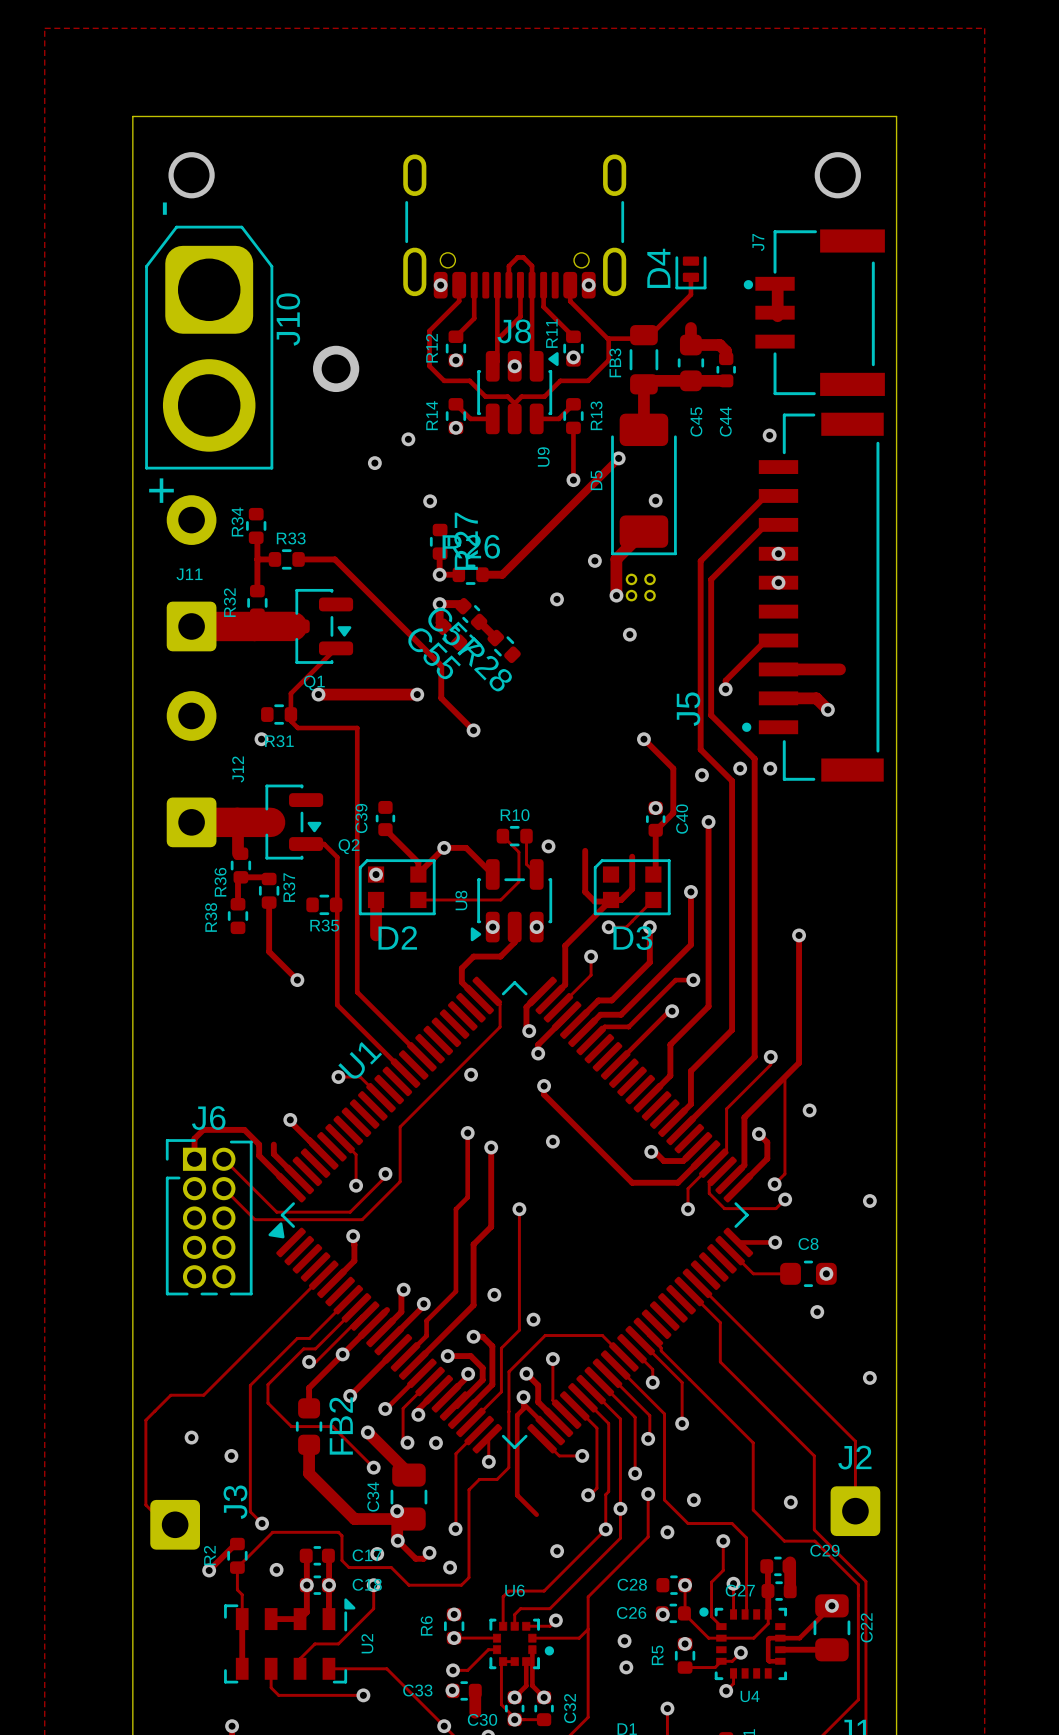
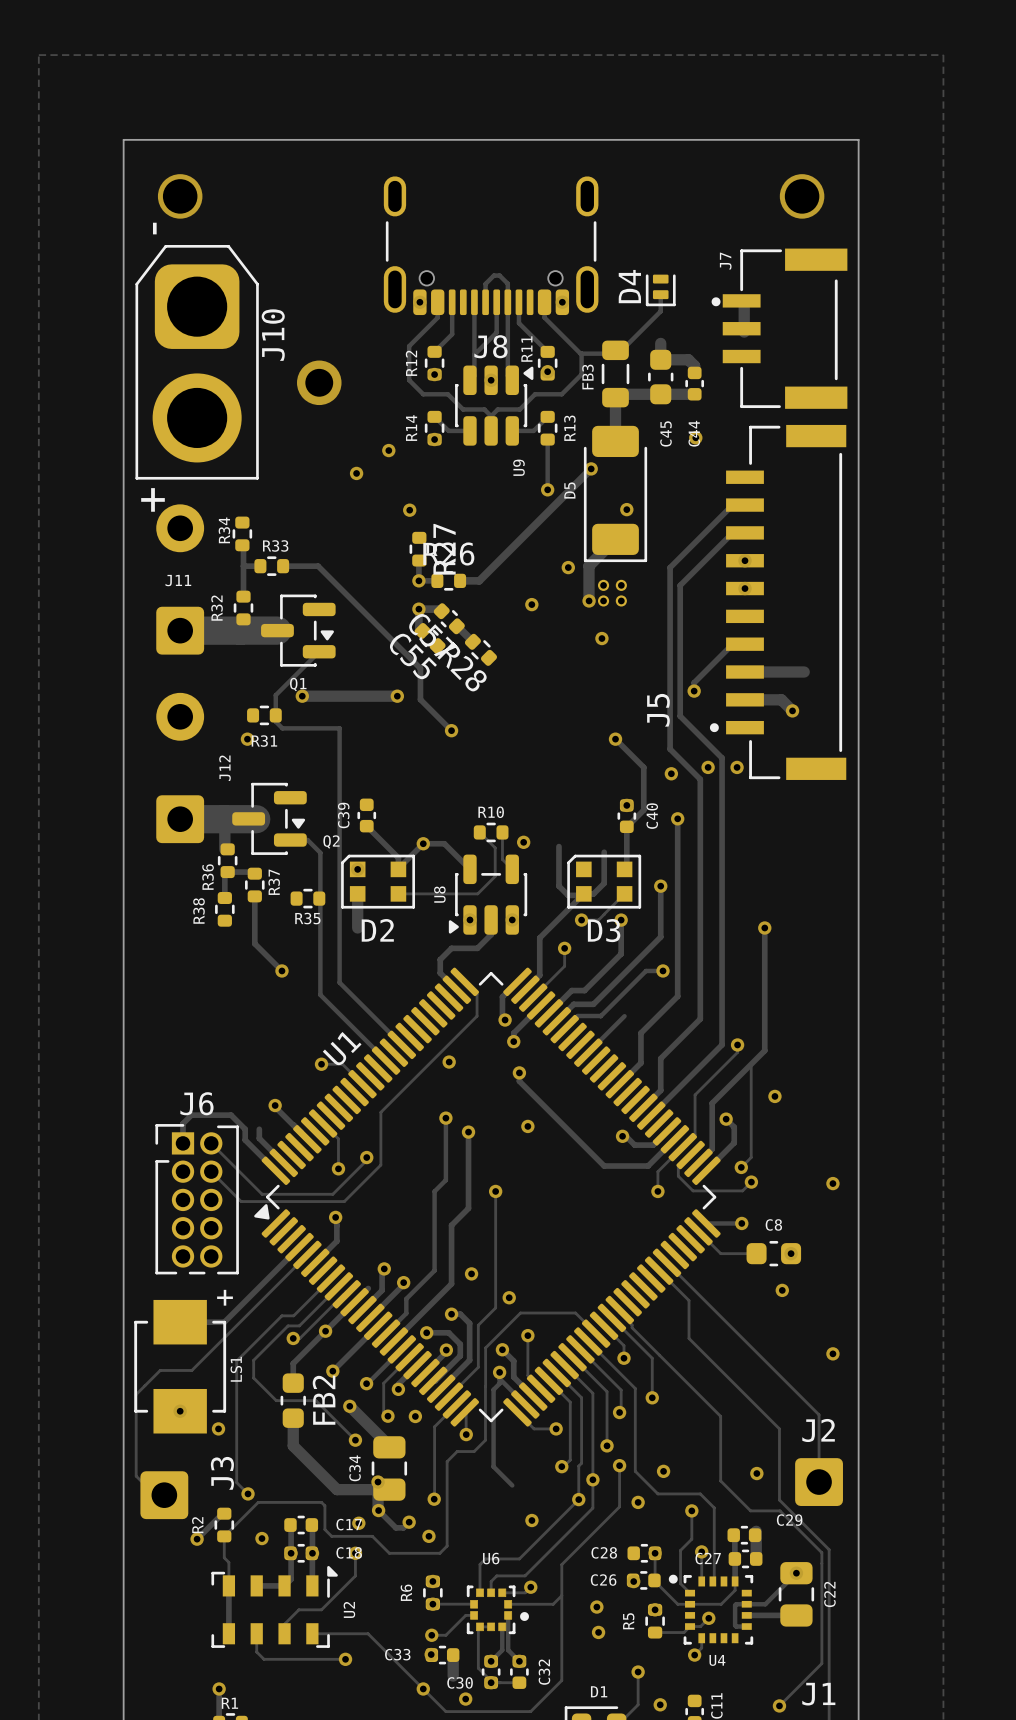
via position: (769, 435) -> (695, 437)
track: (672, 1011) (669, 1011) (653, 1027) -> none
via: (672, 1011) -> none
track: none -> (299, 1247) (224, 1322) (180, 1322)
LS1: none -> (180, 1366)

